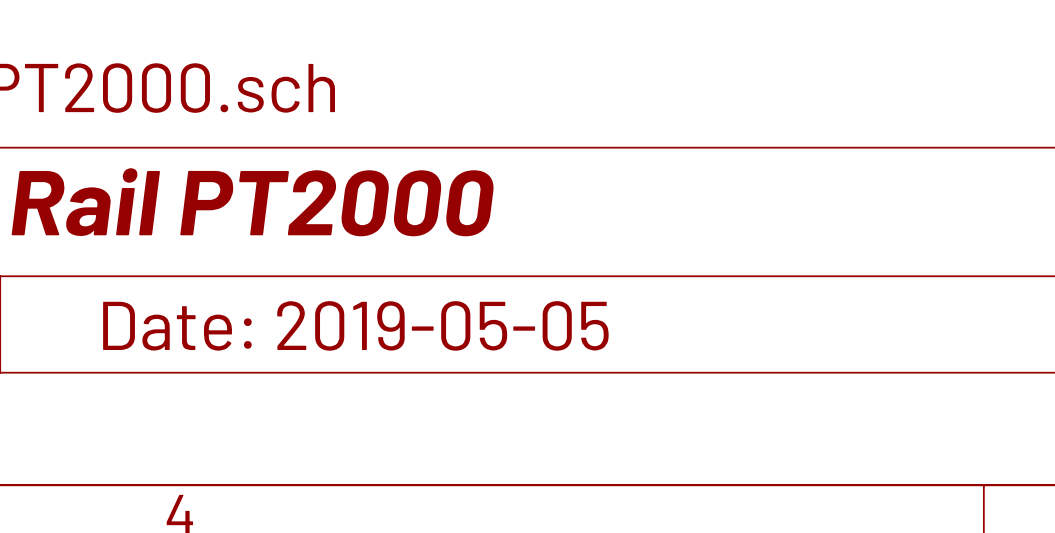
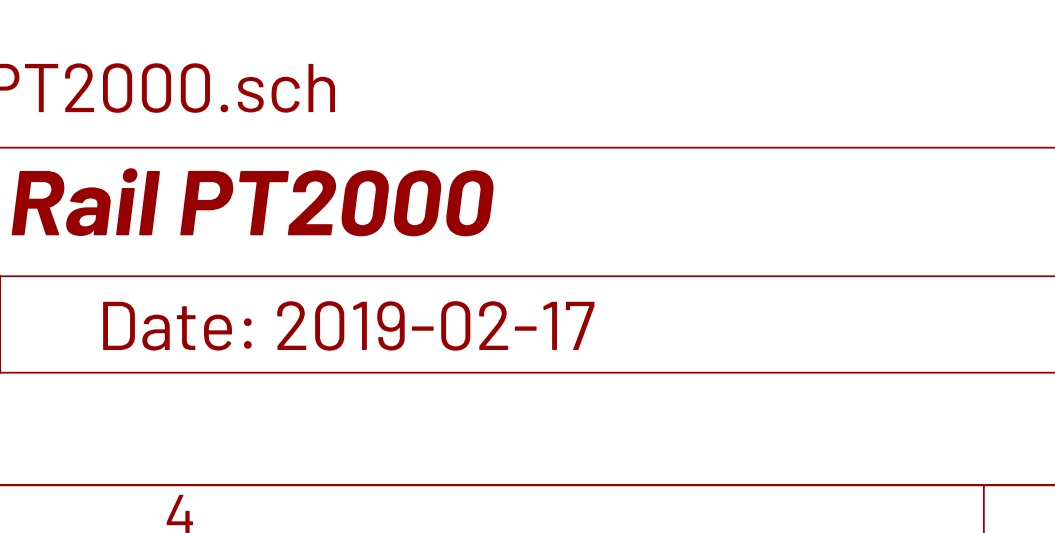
title block: Date: 2019-05-05 (355, 325) -> Date: 2019-02-17 (348, 325)

